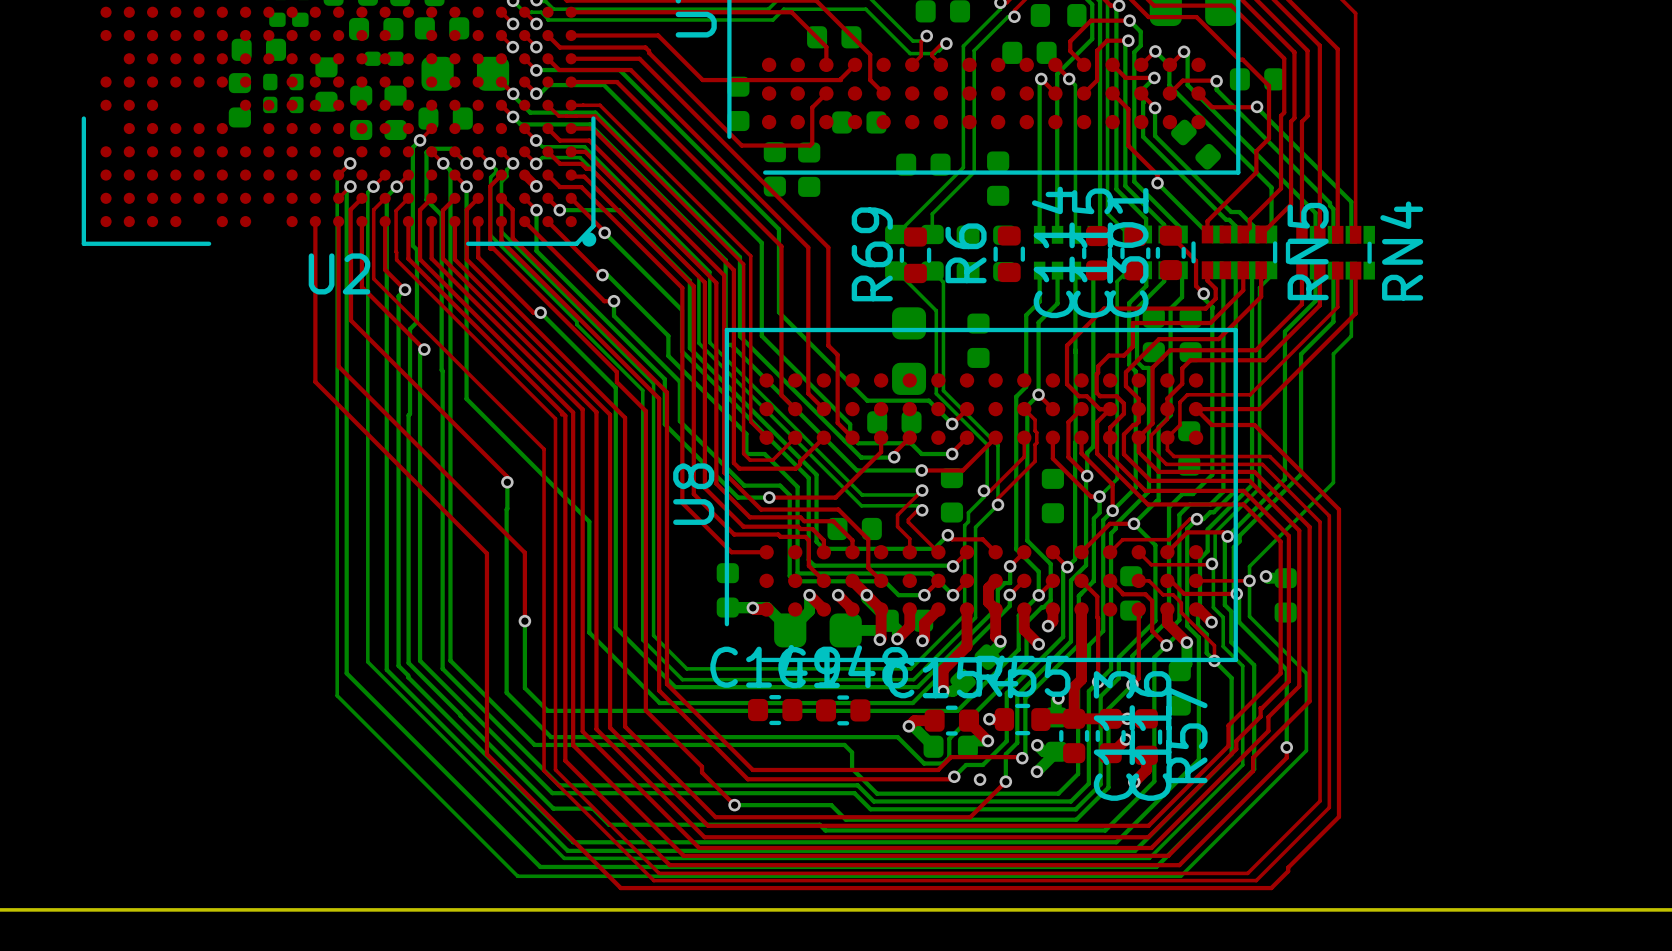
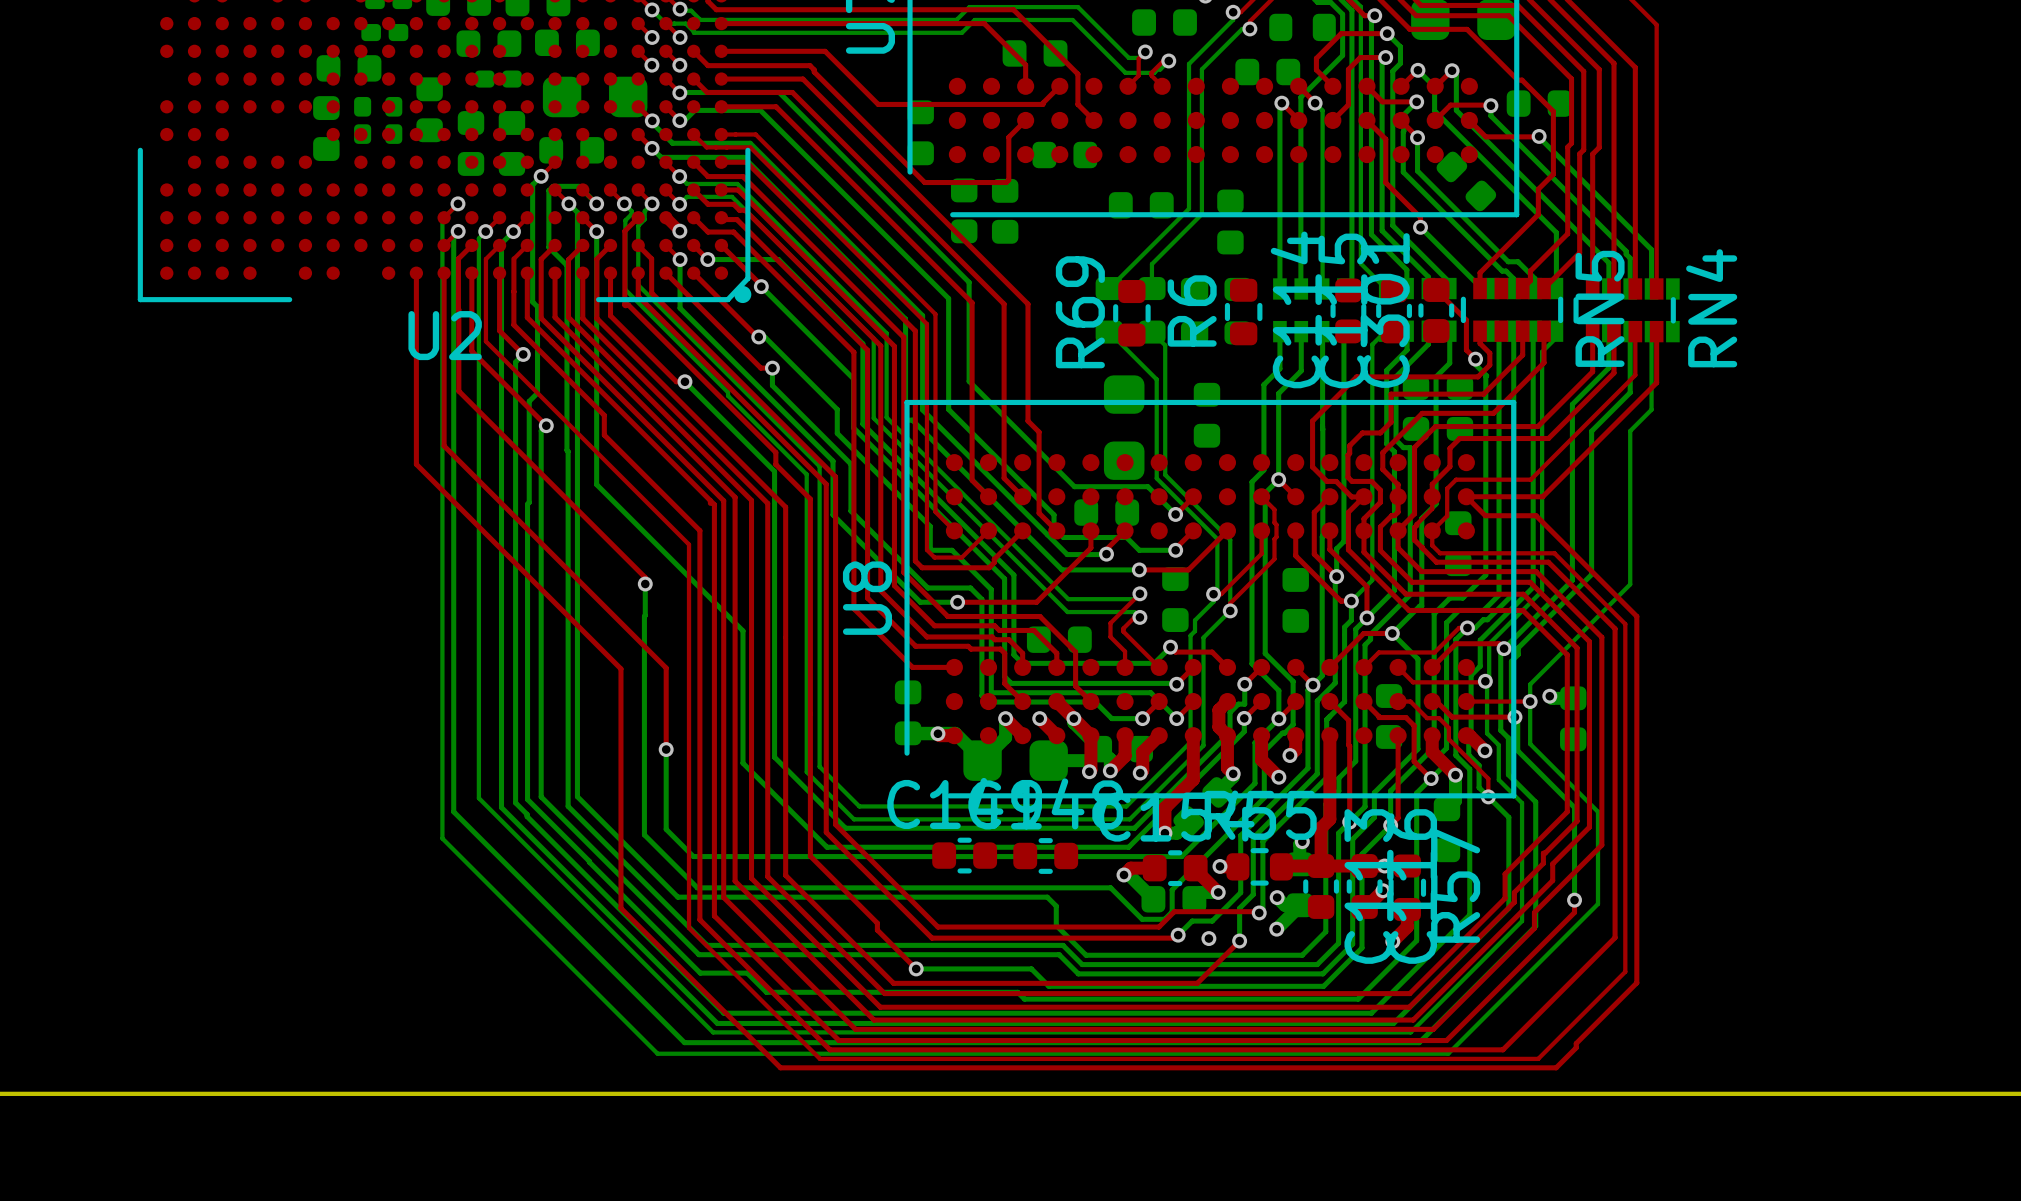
top track: (397, 209) (396, 259) (555, 418) (555, 769) (659, 873) (1247, 873) (1320, 801) (1320, 522) (1262, 464) (1166, 464) (1151, 449) (1151, 435) (1154, 432) -> (513, 258) (513, 324) (604, 415) (604, 435) (699, 530) (699, 919) (829, 1049) (1502, 1049) (1615, 937) (1615, 628) (1548, 562) (1436, 562) (1414, 540) (1414, 527) (1416, 524)

